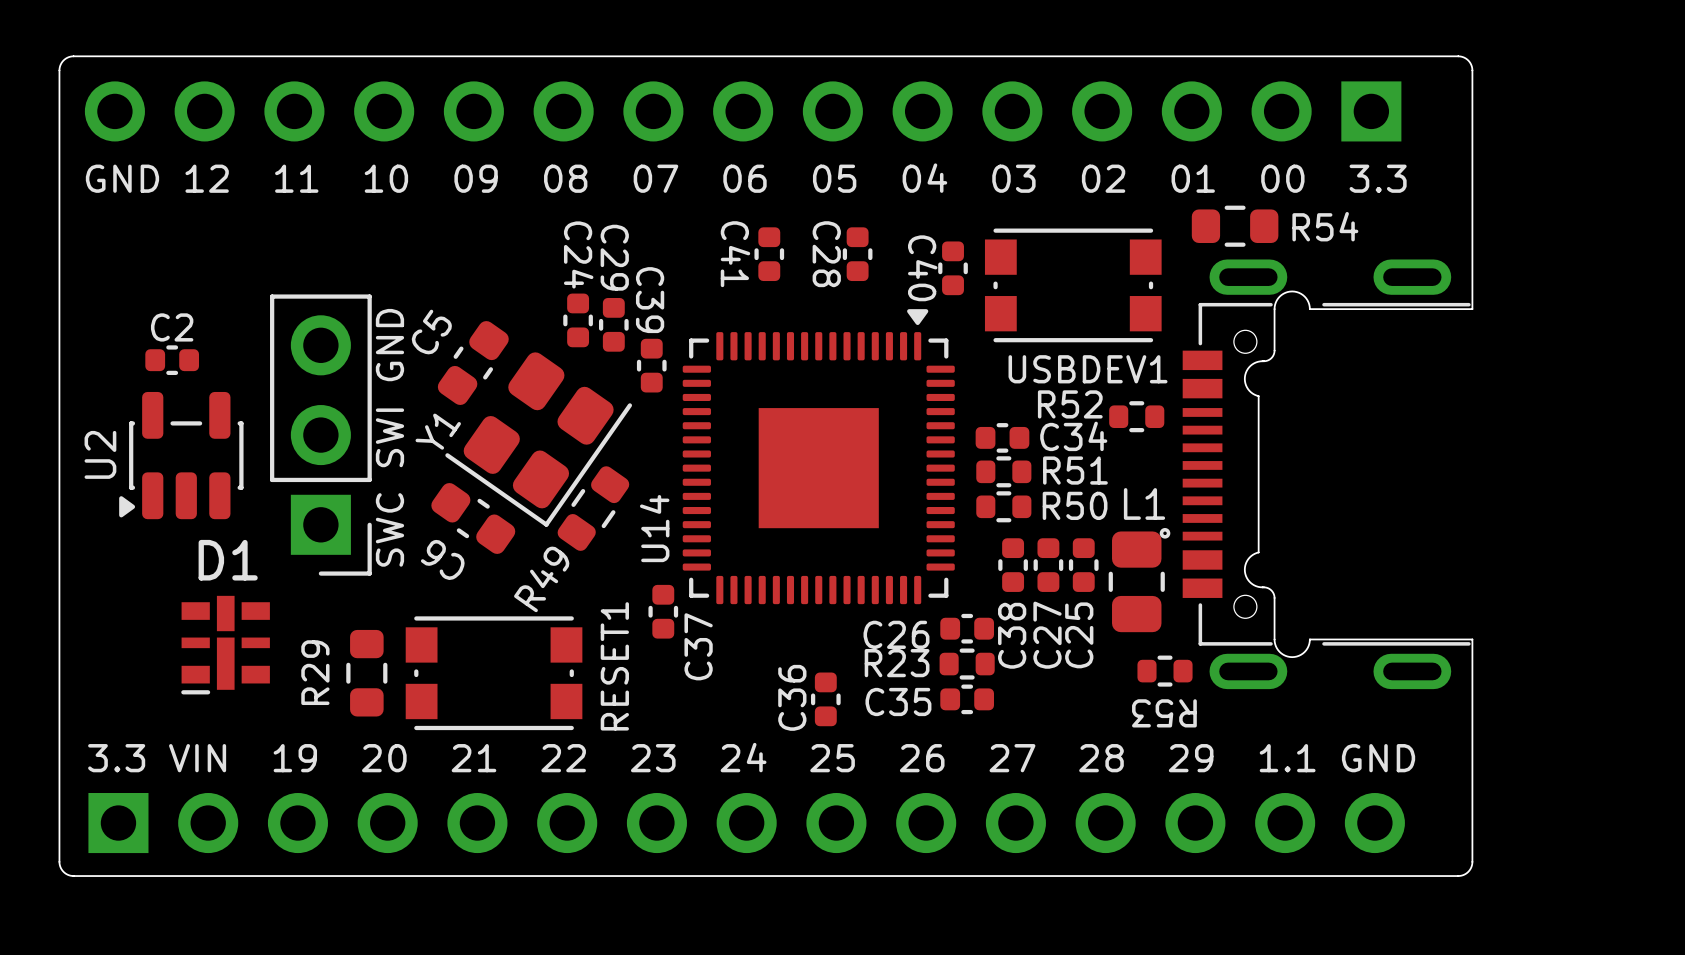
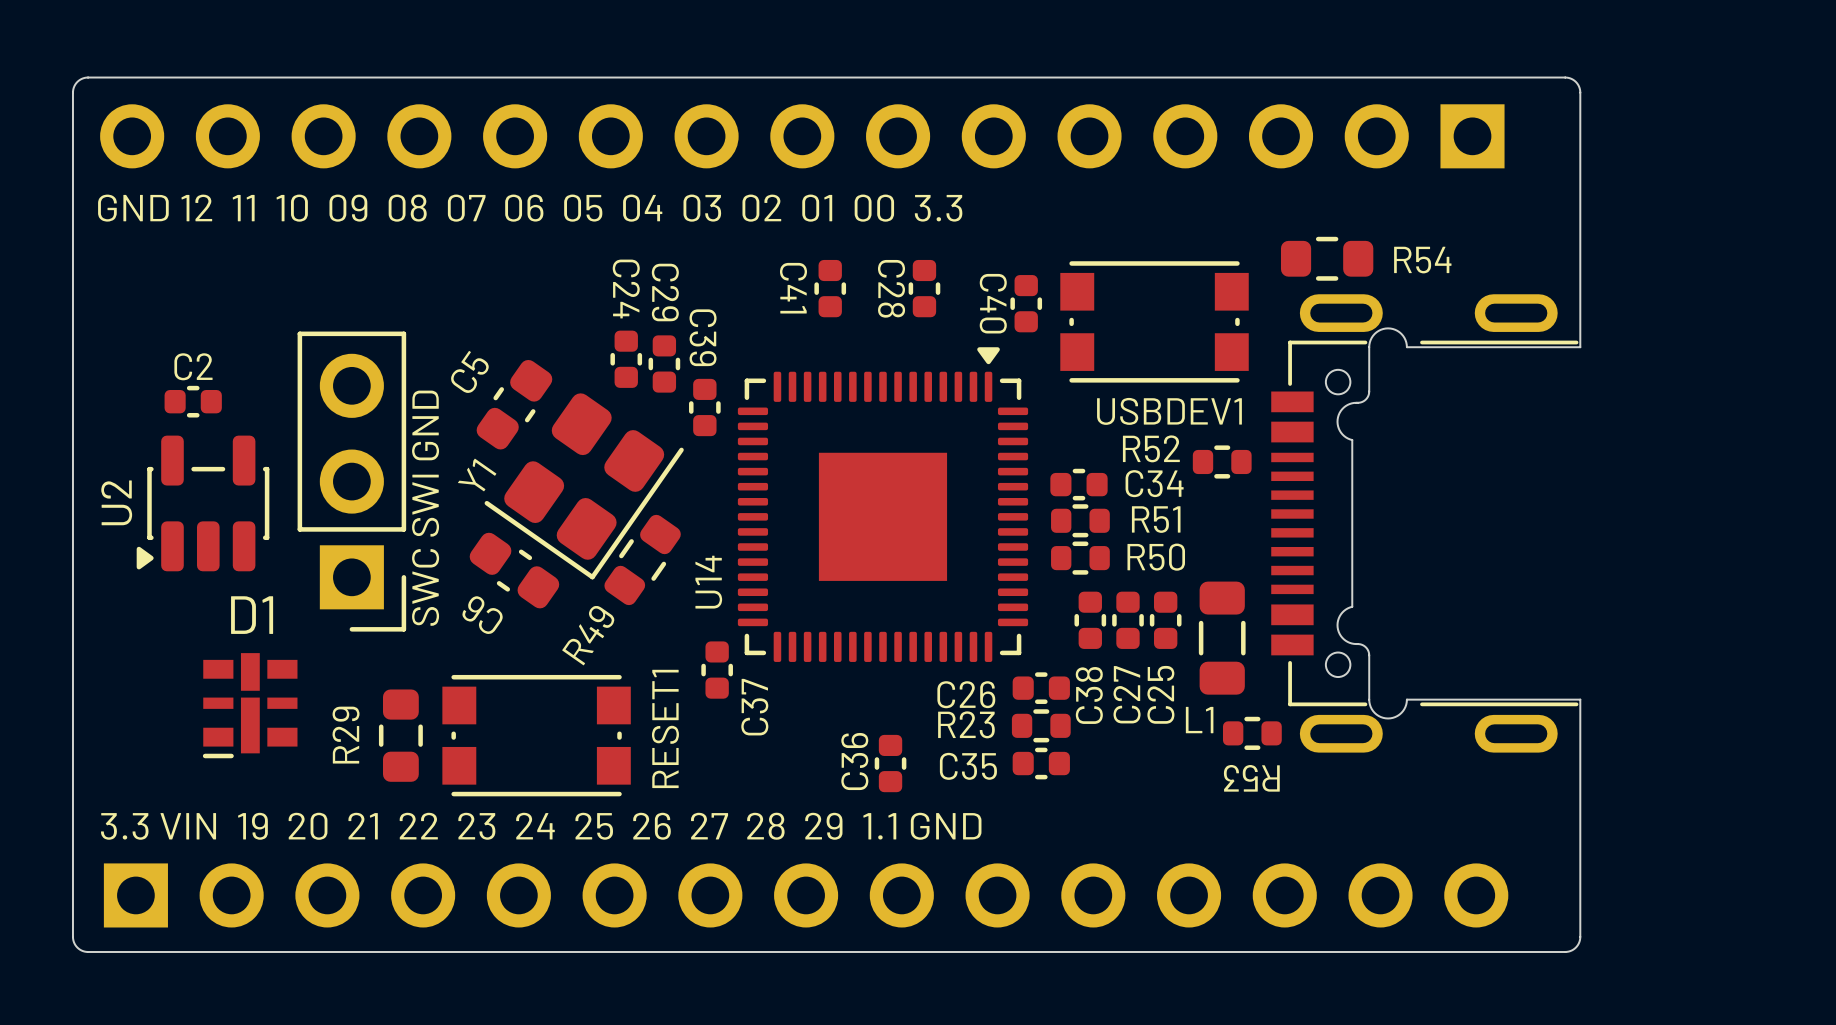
L1 name position: L1 (1144, 503) -> L1 (1199, 720)
drawing: [1159, 528, 1171, 539] -> none
L1 footprint: [1108, 531, 1165, 633] -> [1198, 581, 1246, 695]

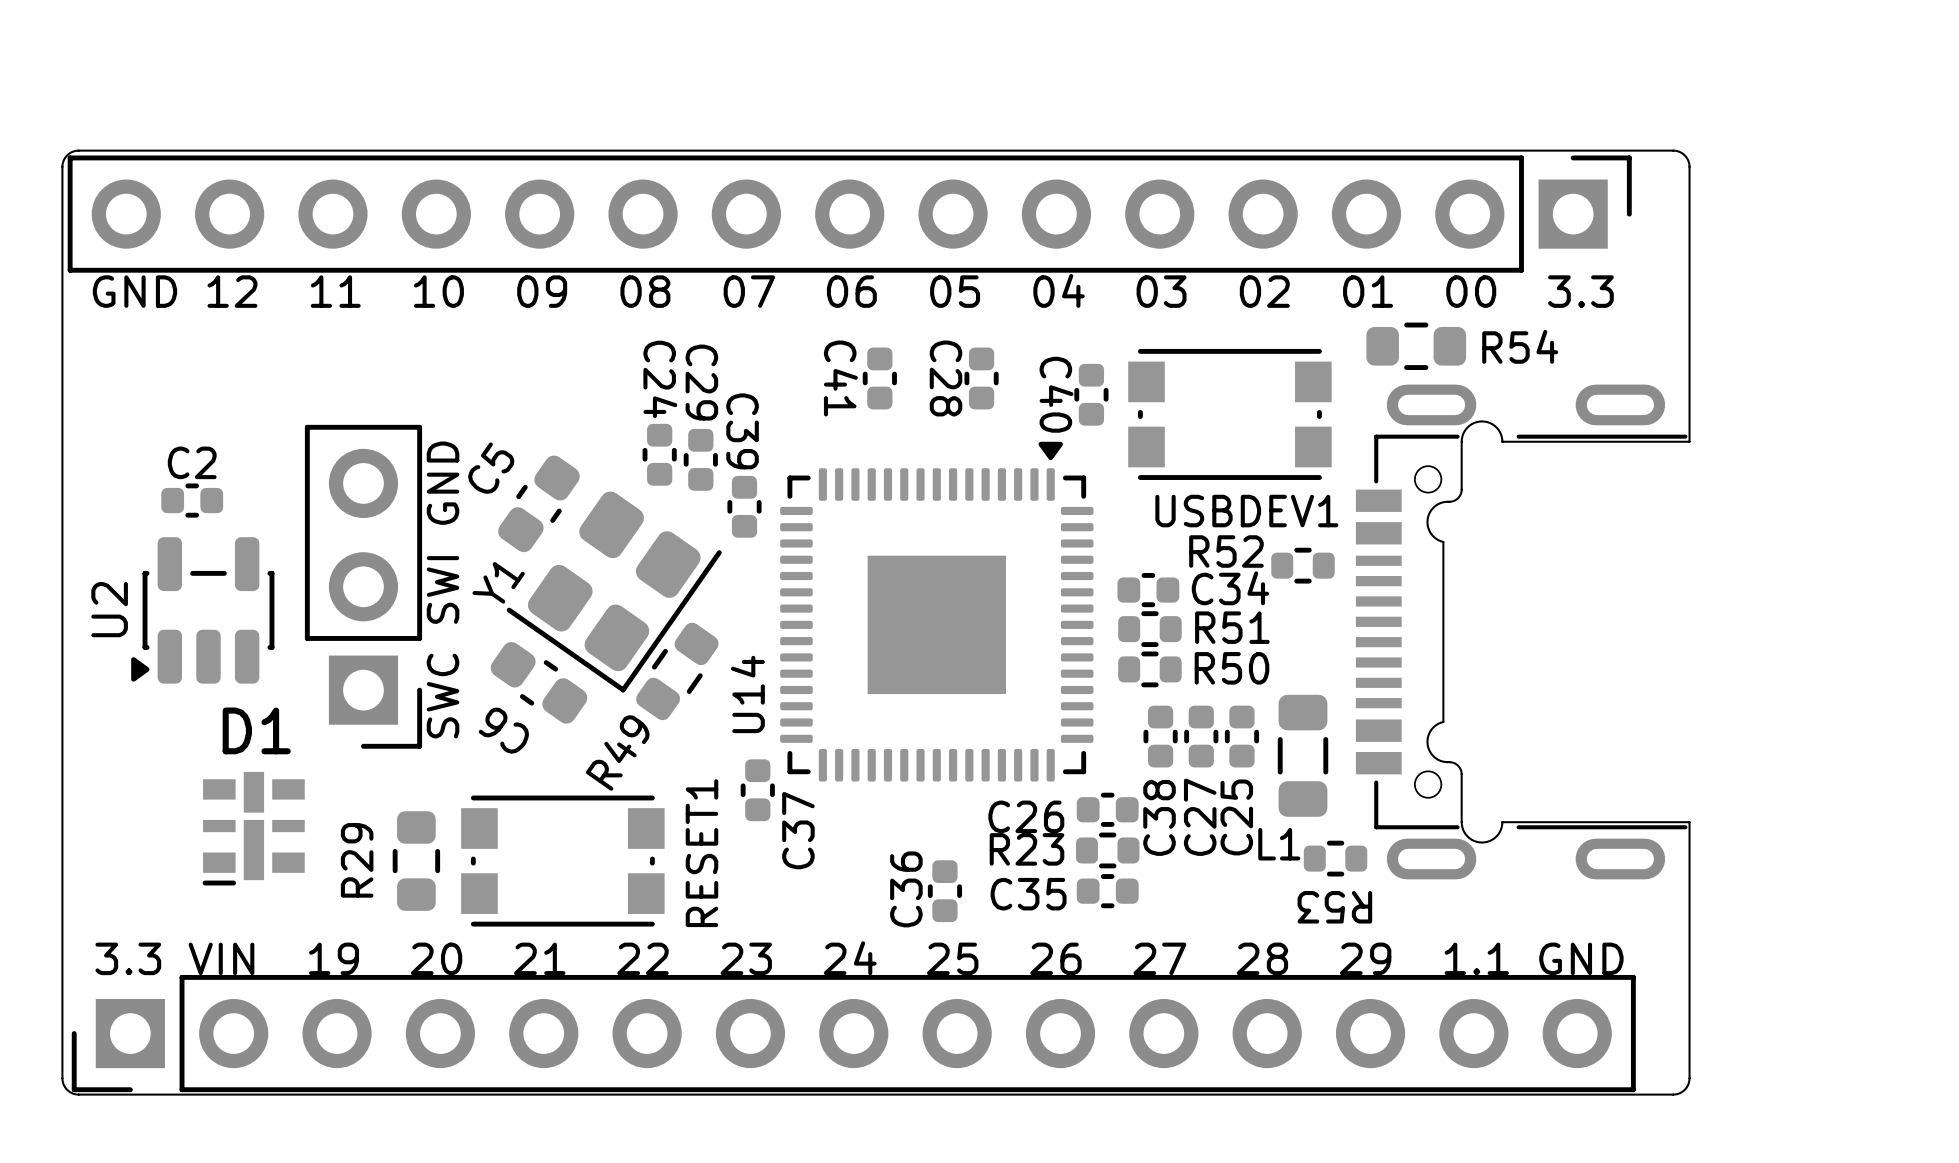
part side: bottom (802, 136) -> top (849, 214)
part side: bottom (806, 895) -> top (853, 1033)

